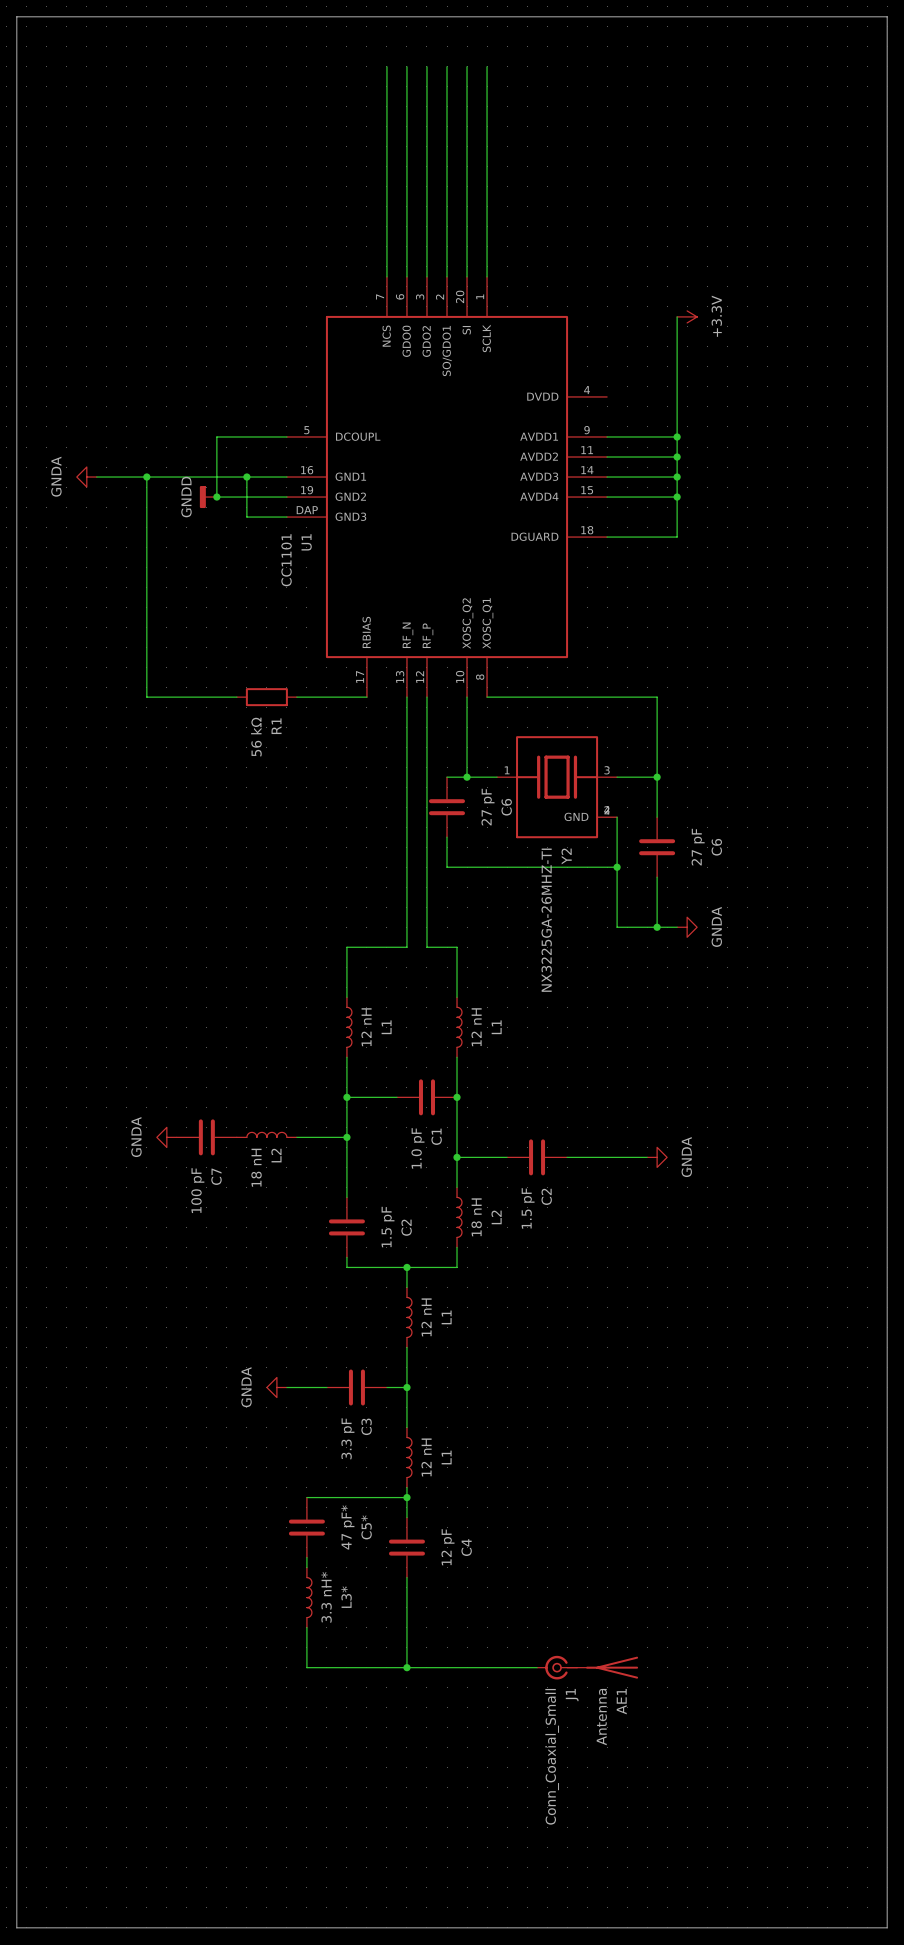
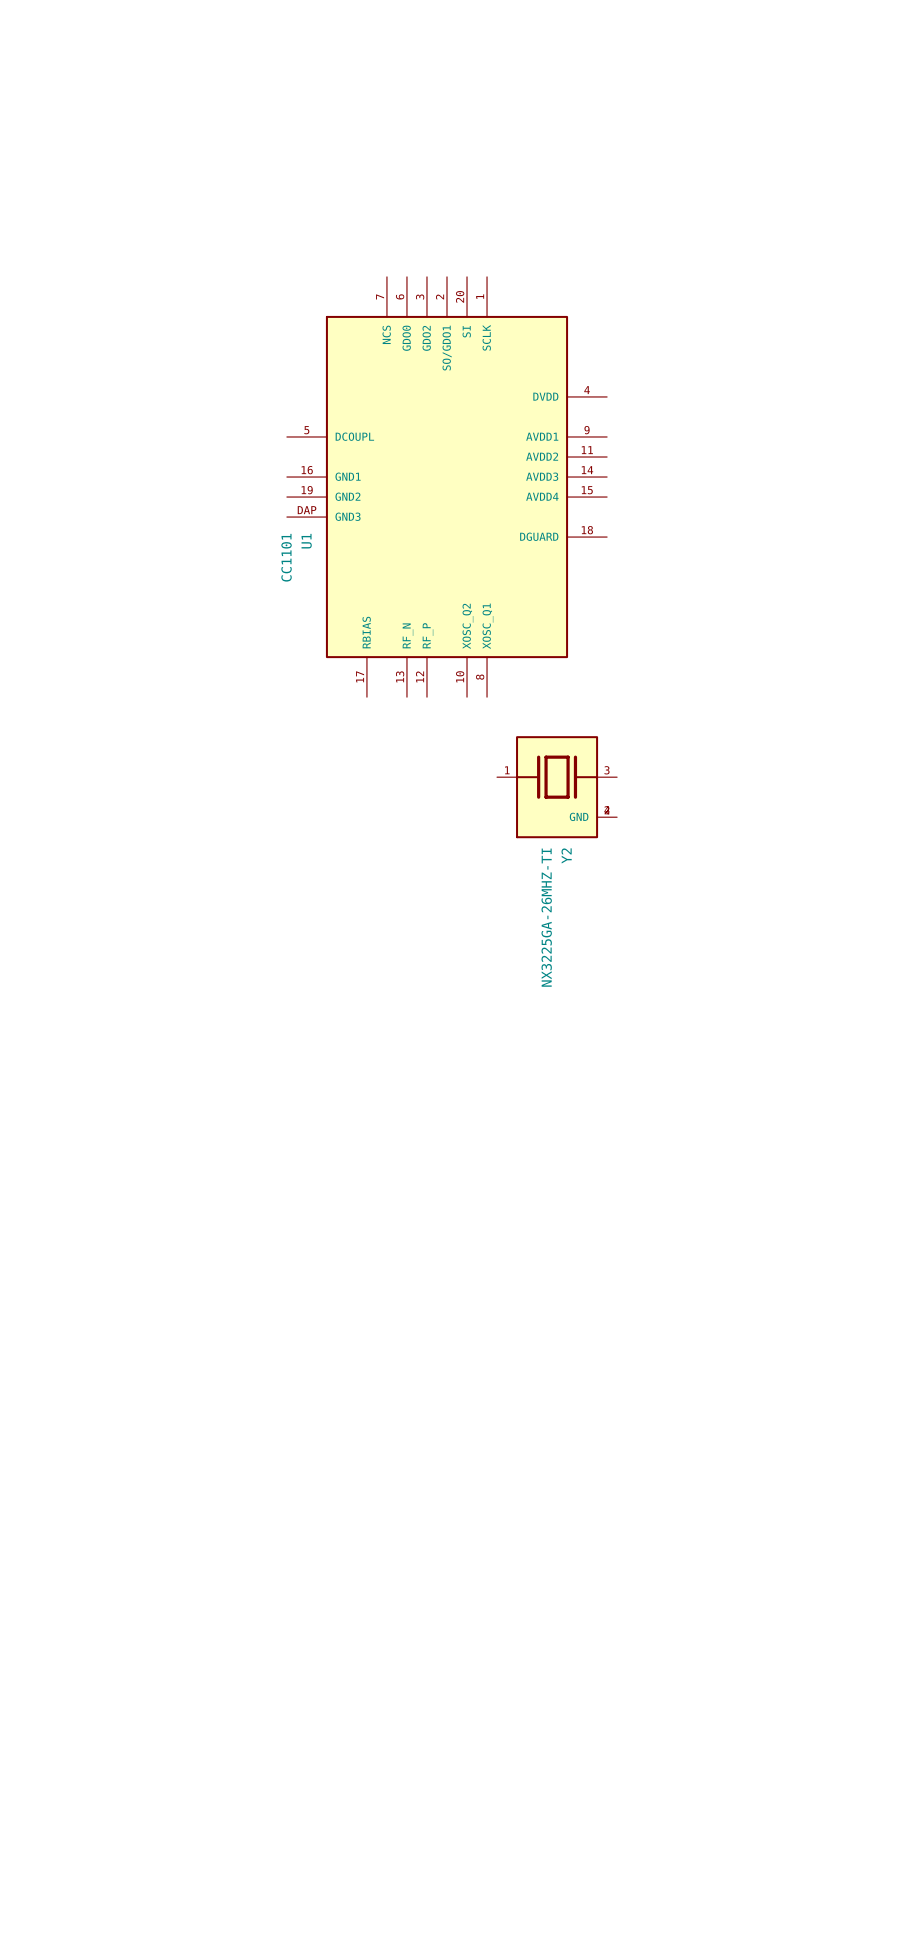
line: (16, 16) (887, 16) (887, 1927) (16, 1927) (16, 16) -> none
wire: (386, 66) (386, 276) -> none
wire: (406, 66) (406, 276) -> none
wire: (426, 66) (426, 276) -> none
wire: (447, 66) (447, 276) -> none
wire: (467, 66) (467, 276) -> none
wire: (487, 66) (487, 276) -> none
wire: (677, 316) (677, 537) (607, 537) -> none
power symbol: +3.3V (687, 316) -> none
wire: (286, 436) (216, 436) (216, 497) (286, 497) -> none
wire: (607, 436) (677, 436) -> none
junction: (677, 436) -> none
wire: (607, 457) (677, 457) -> none
junction: (677, 457) -> none
power symbol: GNDA (86, 477) -> none
wire: (96, 477) (286, 477) -> none
wire: (146, 477) (146, 697) (236, 697) -> none
junction: (146, 477) -> none
wire: (246, 477) (246, 517) (286, 517) -> none
junction: (246, 477) -> none
wire: (607, 477) (677, 477) -> none
junction: (677, 477) -> none
power symbol: GNDD (208, 497) -> none
junction: (216, 497) -> none
wire: (607, 497) (677, 497) -> none
junction: (677, 497) -> none
R1: 56 kΩ (266, 697) -> none
wire: (296, 697) (366, 697) -> none
wire: (406, 697) (406, 947) (346, 947) (346, 997) -> none
wire: (426, 697) (426, 947) (457, 947) (457, 997) -> none
wire: (467, 697) (467, 777) -> none
wire: (487, 697) (657, 697) (657, 817) -> none
wire: (447, 777) (497, 777) -> none
junction: (467, 777) -> none
wire: (617, 777) (657, 777) -> none
junction: (657, 777) -> none
C6: 27 pF (447, 807) -> none
wire: (617, 817) (617, 927) (677, 927) -> none
wire: (447, 837) (447, 867) (617, 867) -> none
C6: 27 pF (657, 847) -> none
junction: (617, 867) -> none
wire: (657, 877) (657, 927) -> none
junction: (657, 927) -> none
power symbol: GNDA (687, 927) -> none
L1: 12 nH (349, 1027) -> none
L1: 12 nH (459, 1027) -> none
wire: (346, 1057) (346, 1197) -> none
wire: (457, 1057) (457, 1187) -> none
wire: (346, 1097) (396, 1097) -> none
junction: (346, 1097) -> none
C1: 1.0 pF (426, 1097) -> none
junction: (457, 1097) -> none
L2: 18 nH (266, 1134) -> none
power symbol: GNDA (166, 1137) -> none
C7: 100 pF (206, 1137) -> none
wire: (296, 1137) (346, 1137) -> none
junction: (346, 1137) -> none
wire: (457, 1157) (507, 1157) -> none
junction: (457, 1157) -> none
C2: 1.5 pF (537, 1157) -> none
wire: (567, 1157) (647, 1157) -> none
power symbol: GNDA (657, 1157) -> none
L2: 18 nH (459, 1217) -> none
C2: 1.5 pF (346, 1227) -> none
wire: (457, 1247) (457, 1267) (346, 1267) (346, 1257) -> none
wire: (406, 1267) (406, 1287) -> none
junction: (406, 1267) -> none
L1: 12 nH (409, 1317) -> none
wire: (406, 1347) (406, 1427) -> none
power symbol: GNDA (276, 1387) -> none
wire: (286, 1387) (326, 1387) -> none
C3: 3.3 pF (356, 1387) -> none
wire: (386, 1387) (406, 1387) -> none
junction: (406, 1387) -> none
L1: 12 nH (409, 1457) -> none
wire: (406, 1487) (406, 1517) -> none
wire: (306, 1497) (406, 1497) -> none
junction: (406, 1497) -> none
C5*: 47 pF* (306, 1527) -> none
C4: 12 pF (406, 1547) -> none
wire: (306, 1557) (306, 1567) -> none
wire: (406, 1577) (406, 1667) -> none
L3*: 3.3 nH* (309, 1597) -> none
wire: (306, 1627) (306, 1667) (537, 1667) -> none
junction: (406, 1667) -> none
J1: Conn_Coaxial_Small (557, 1667) -> none
AE1: Antenna (607, 1667) -> none

